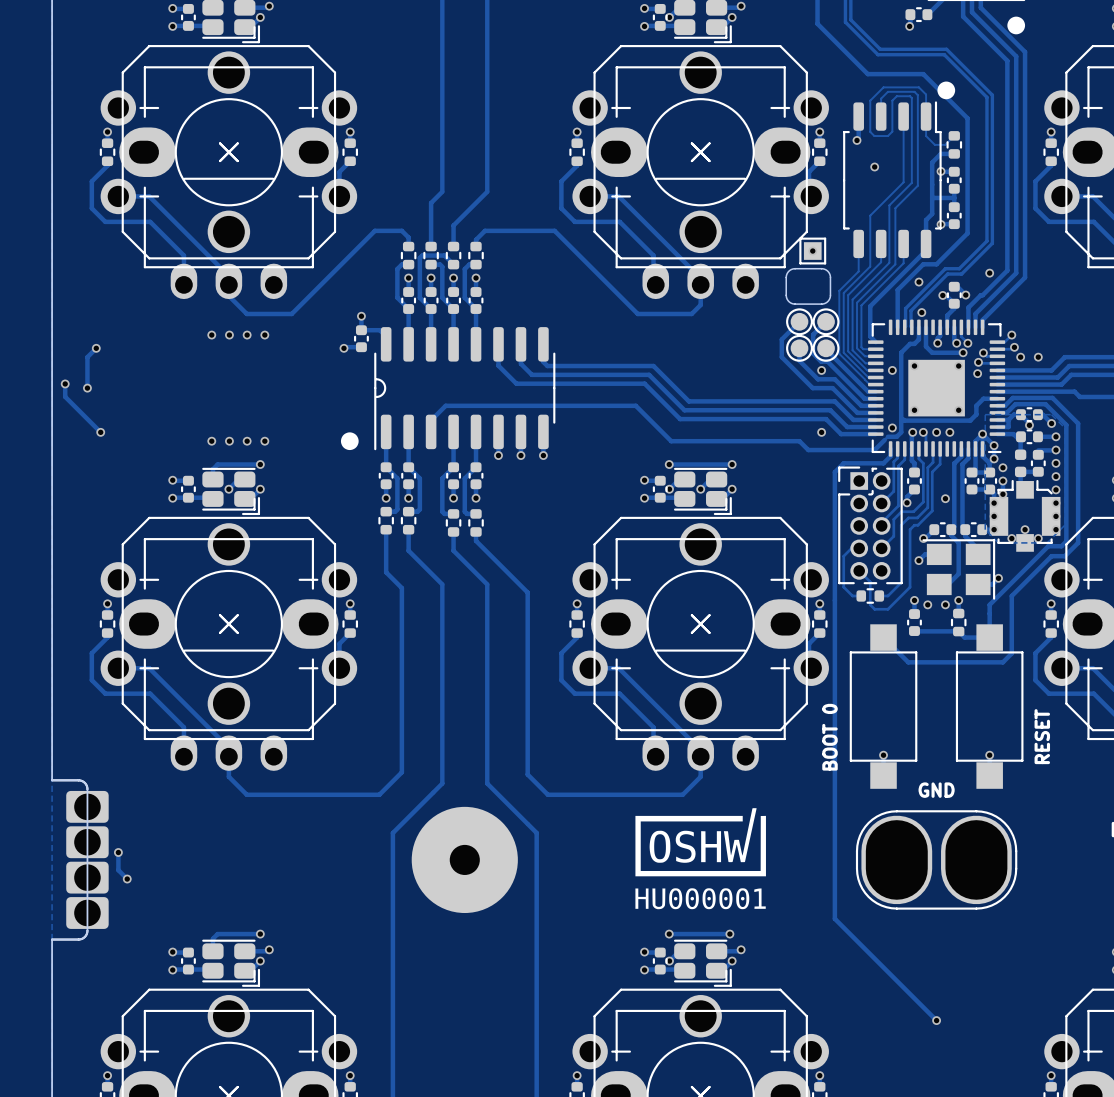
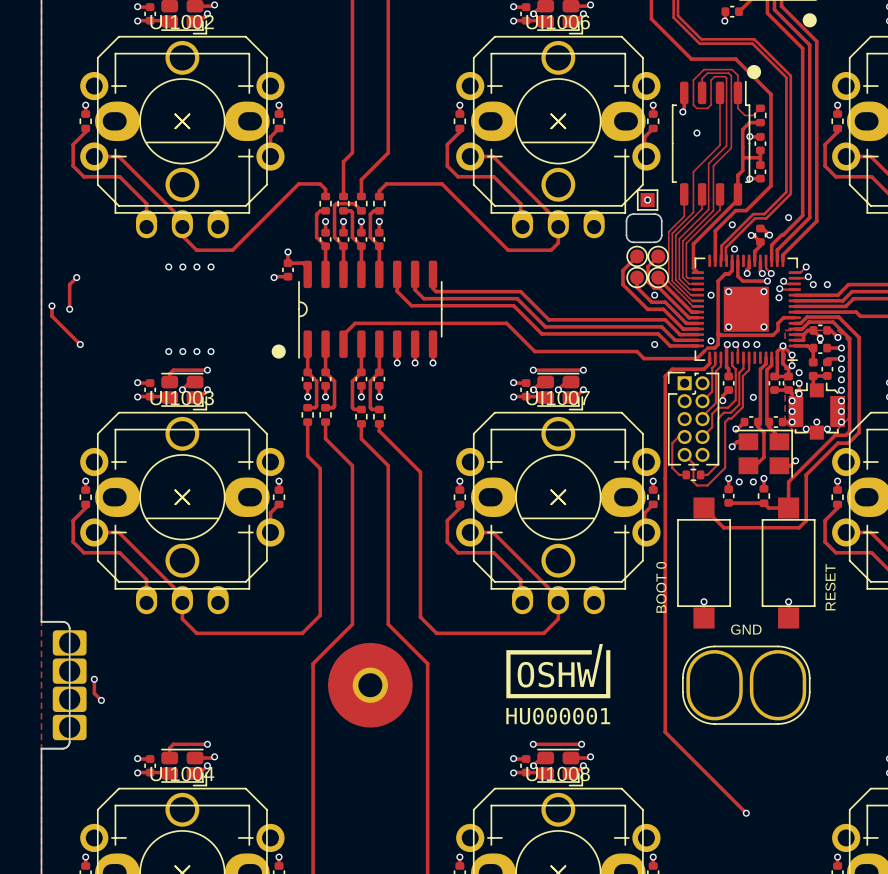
UI1002 name: none -> UI1002 (182, 22)
UI1006 name: none -> UI1006 (558, 22)
UI1003 name: none -> UI1003 (182, 398)
UI1007 name: none -> UI1007 (558, 398)
UI1004 name: none -> UI1004 (182, 773)
UI1008 name: none -> UI1008 (558, 773)

